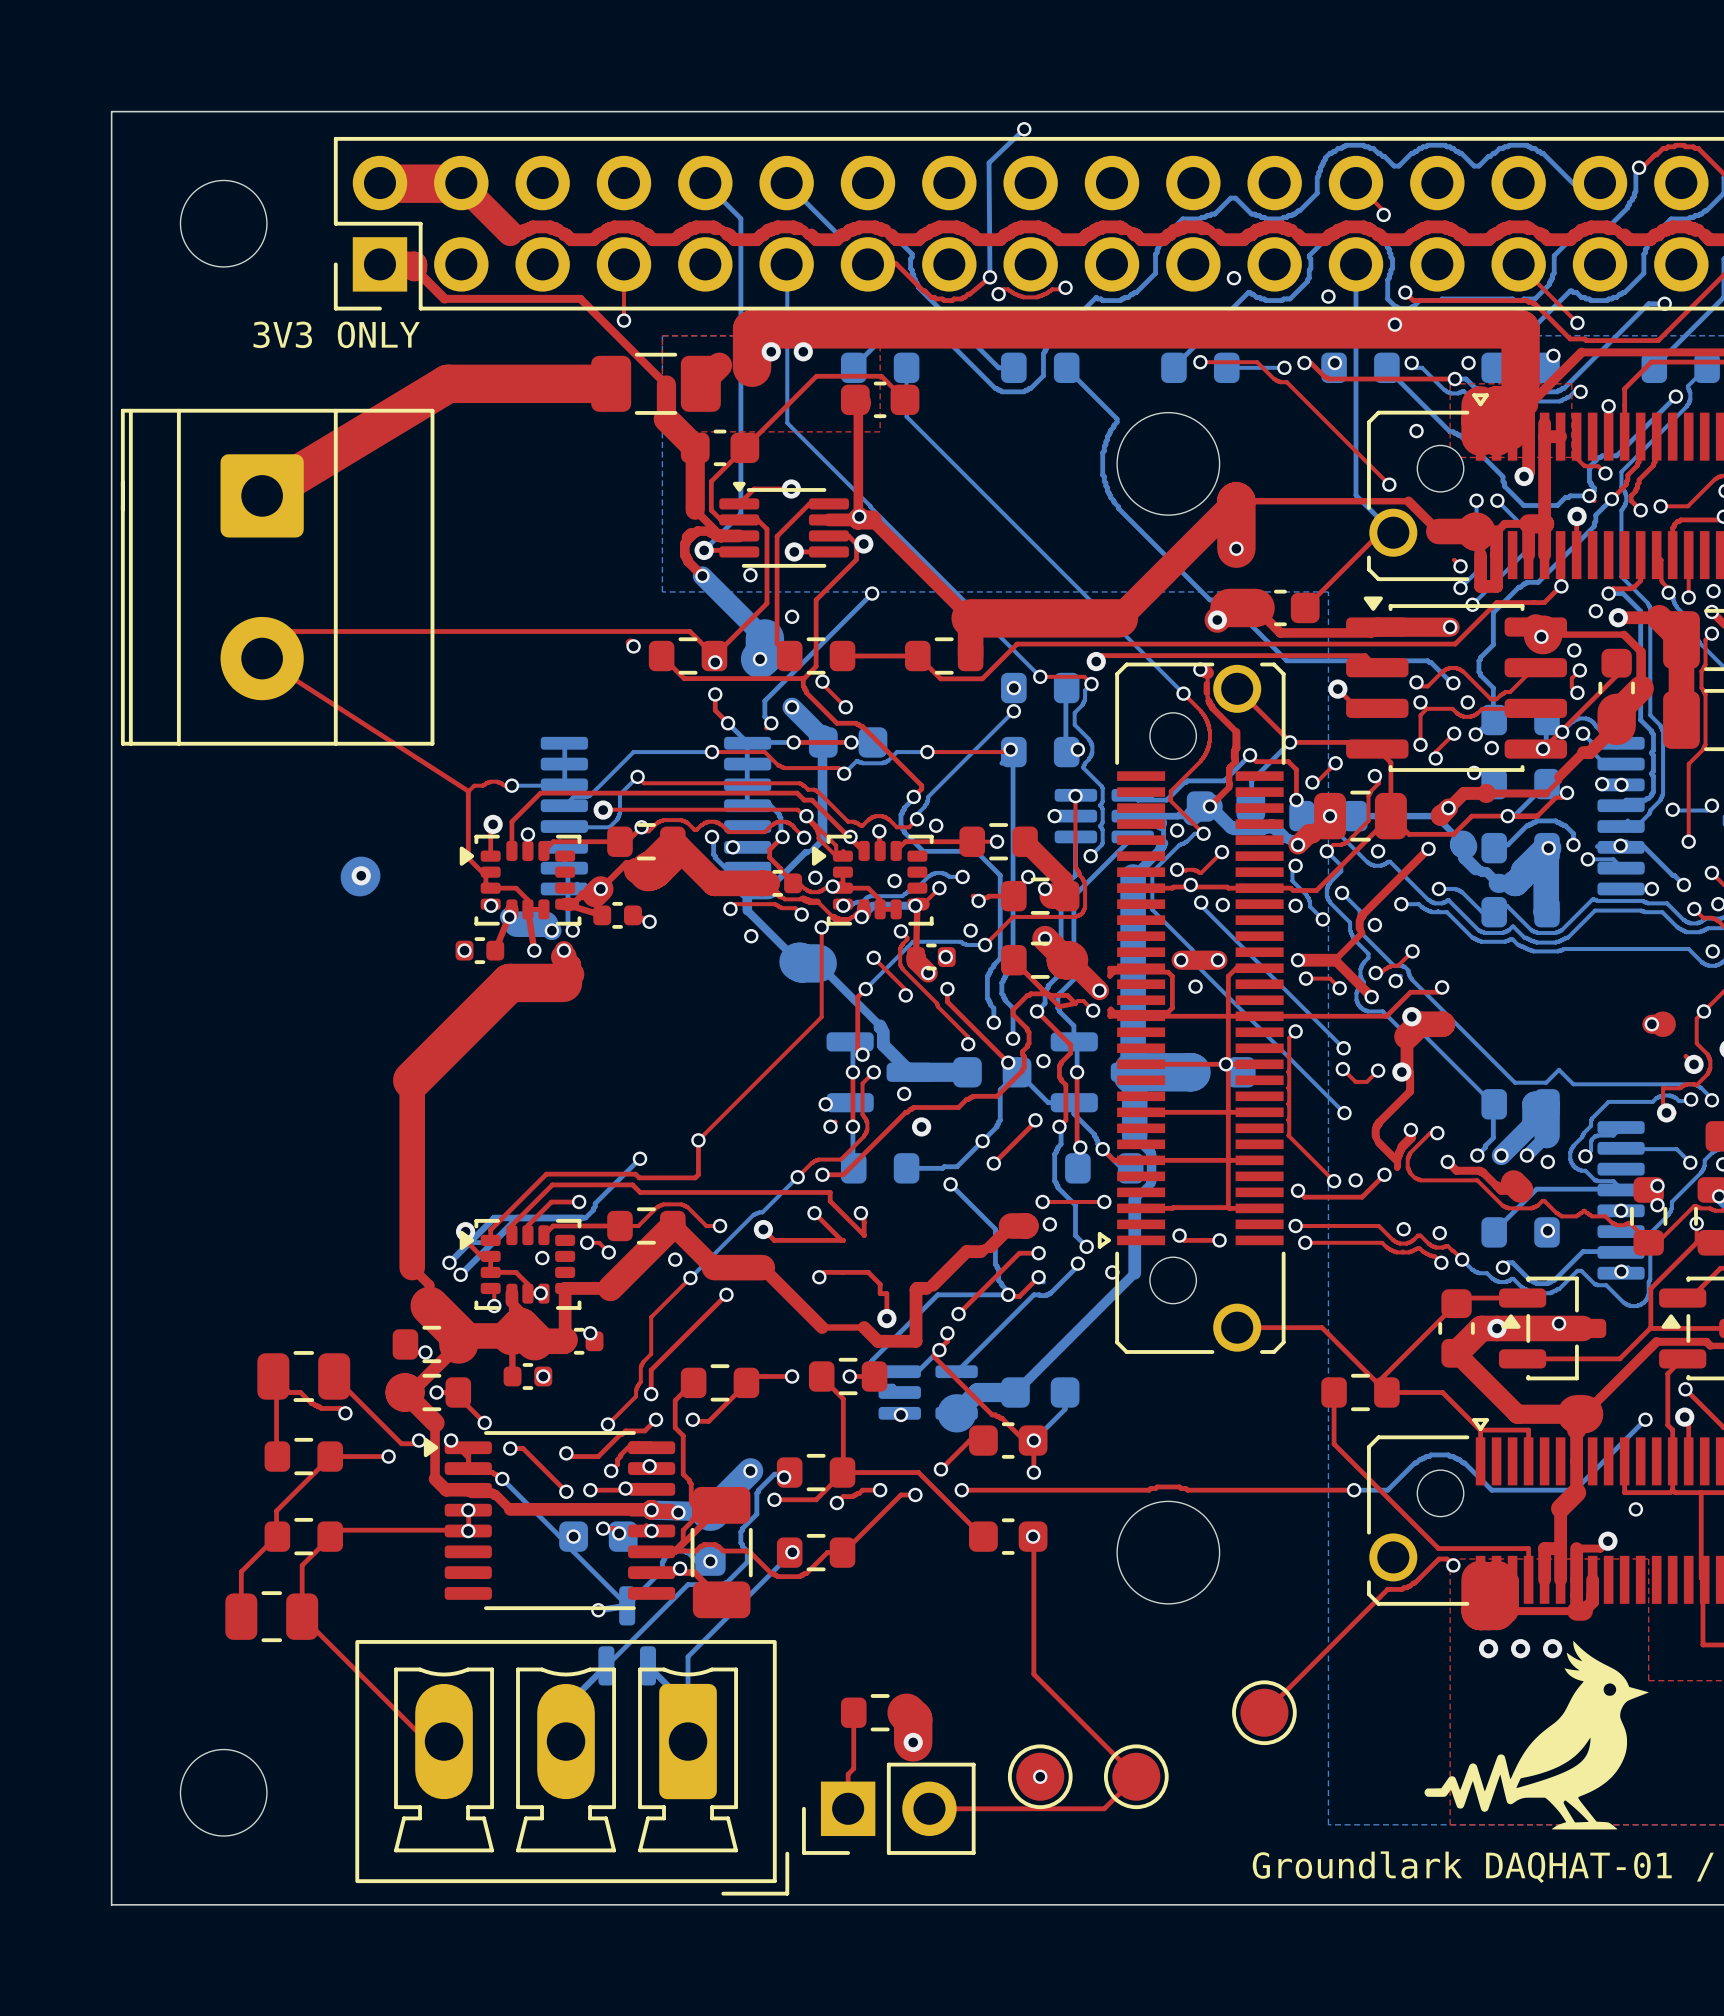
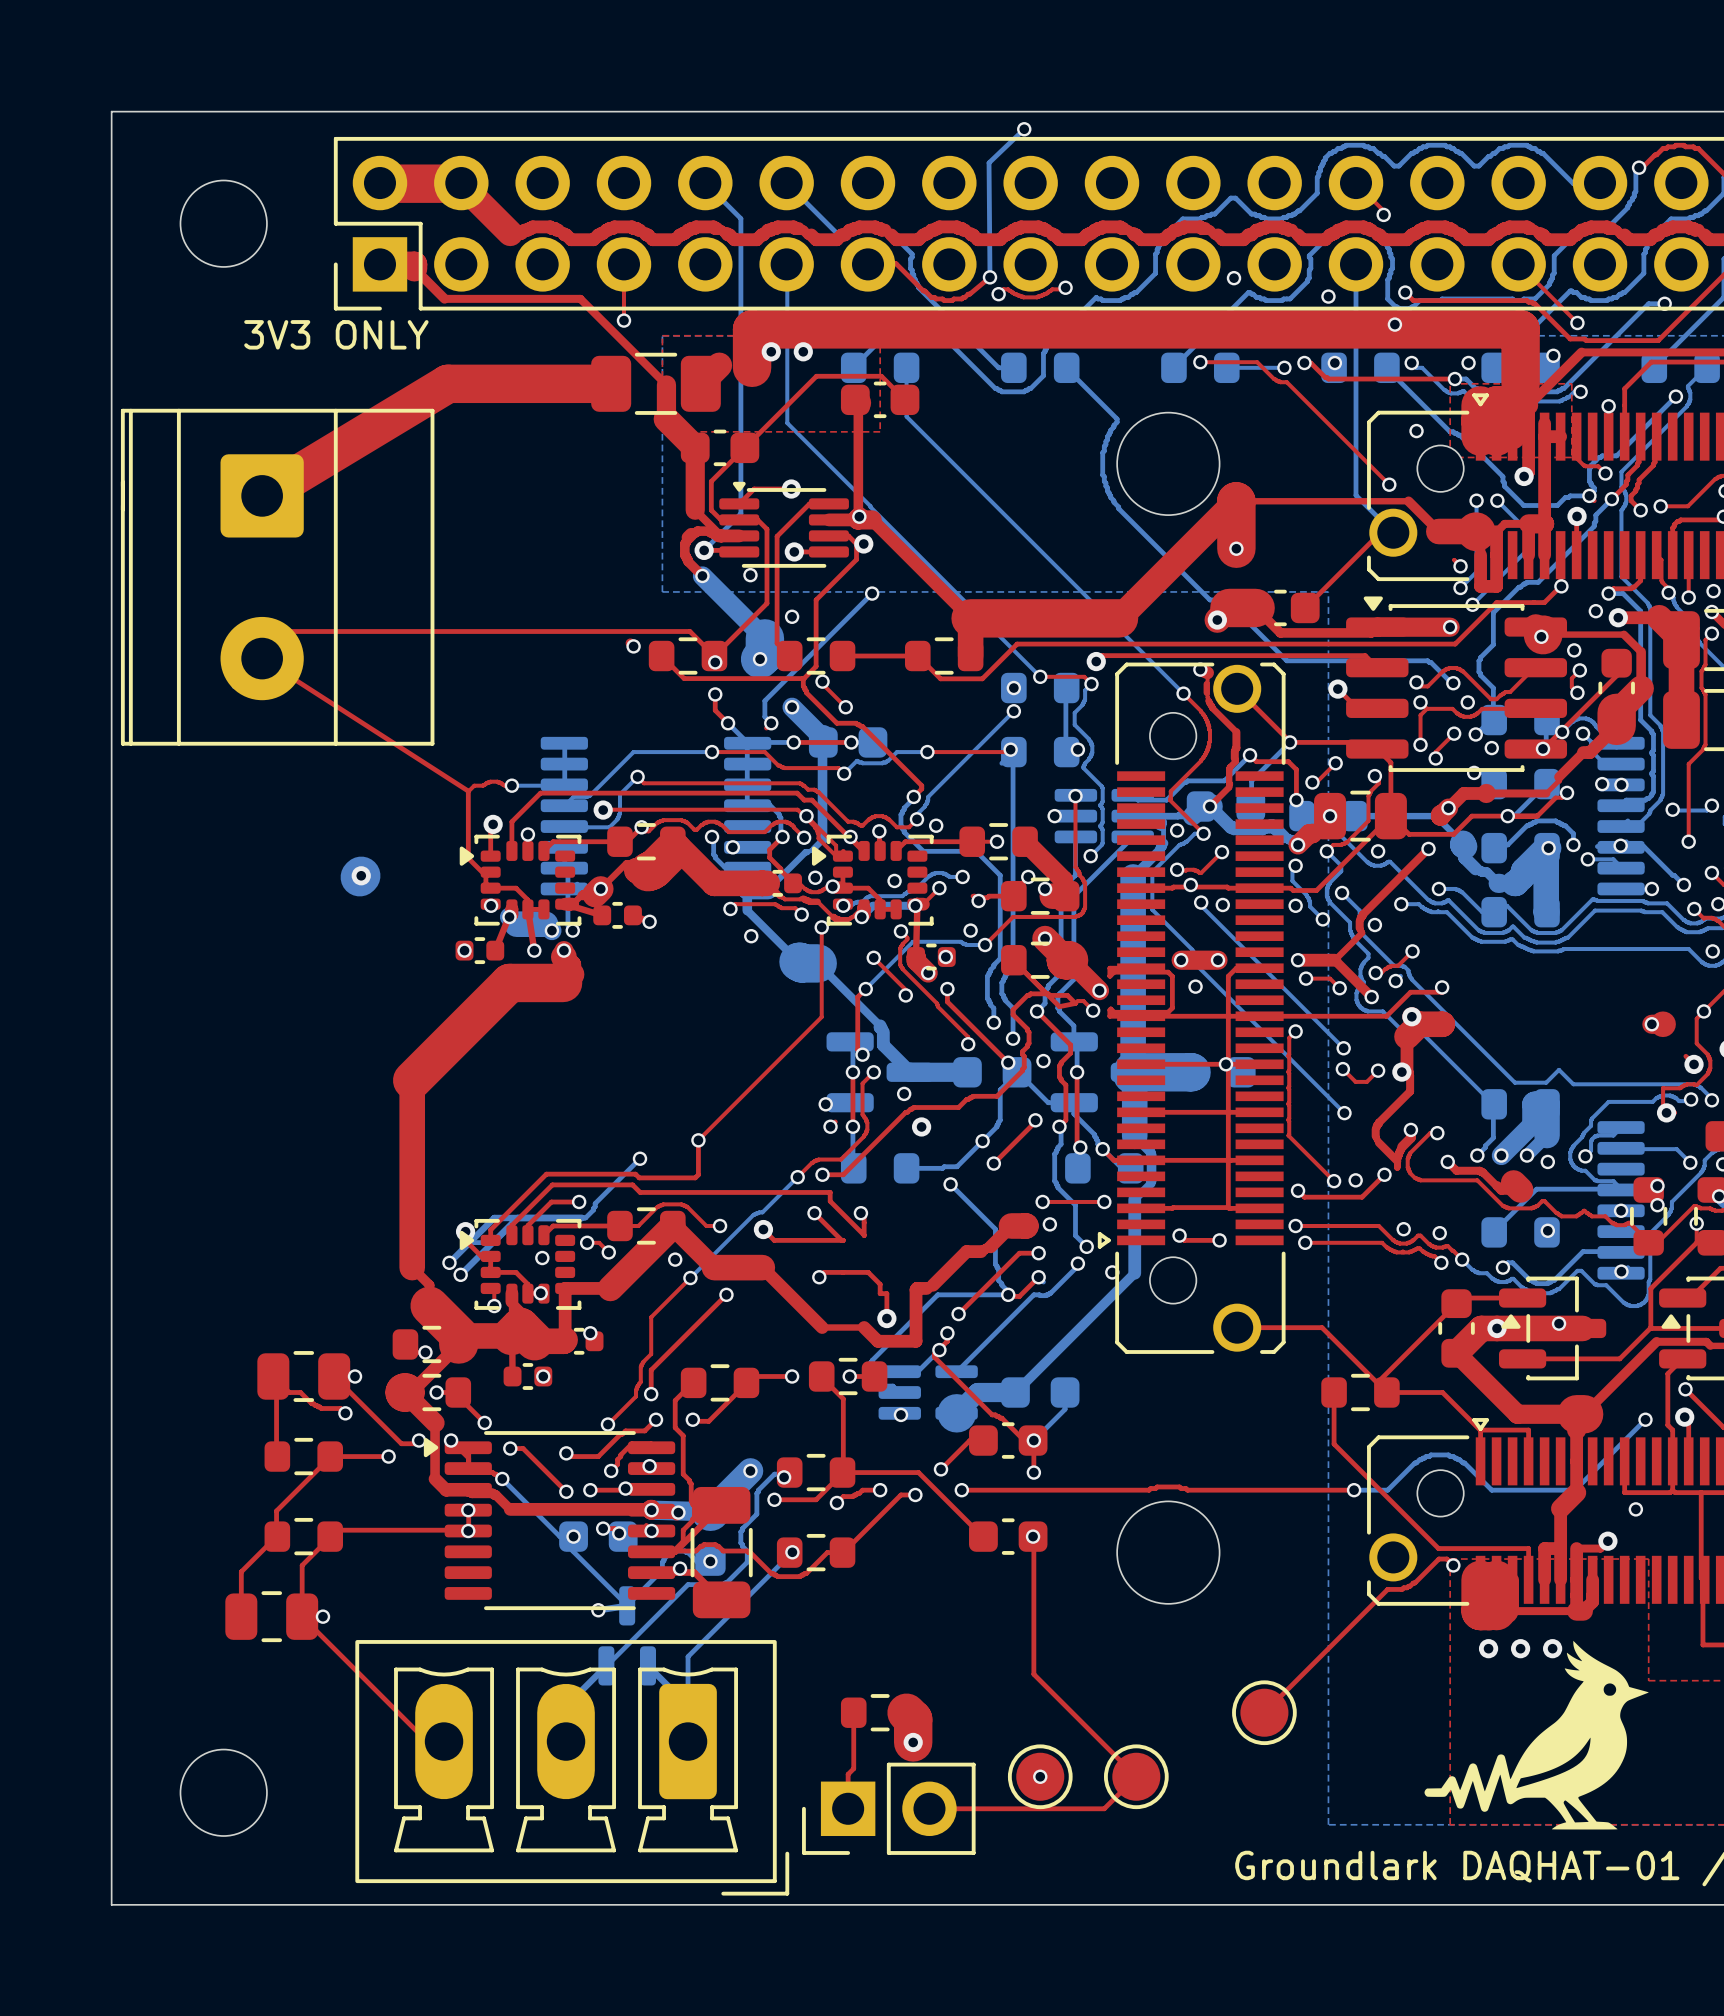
via: none -> (355, 1376)
via: none -> (322, 1616)

